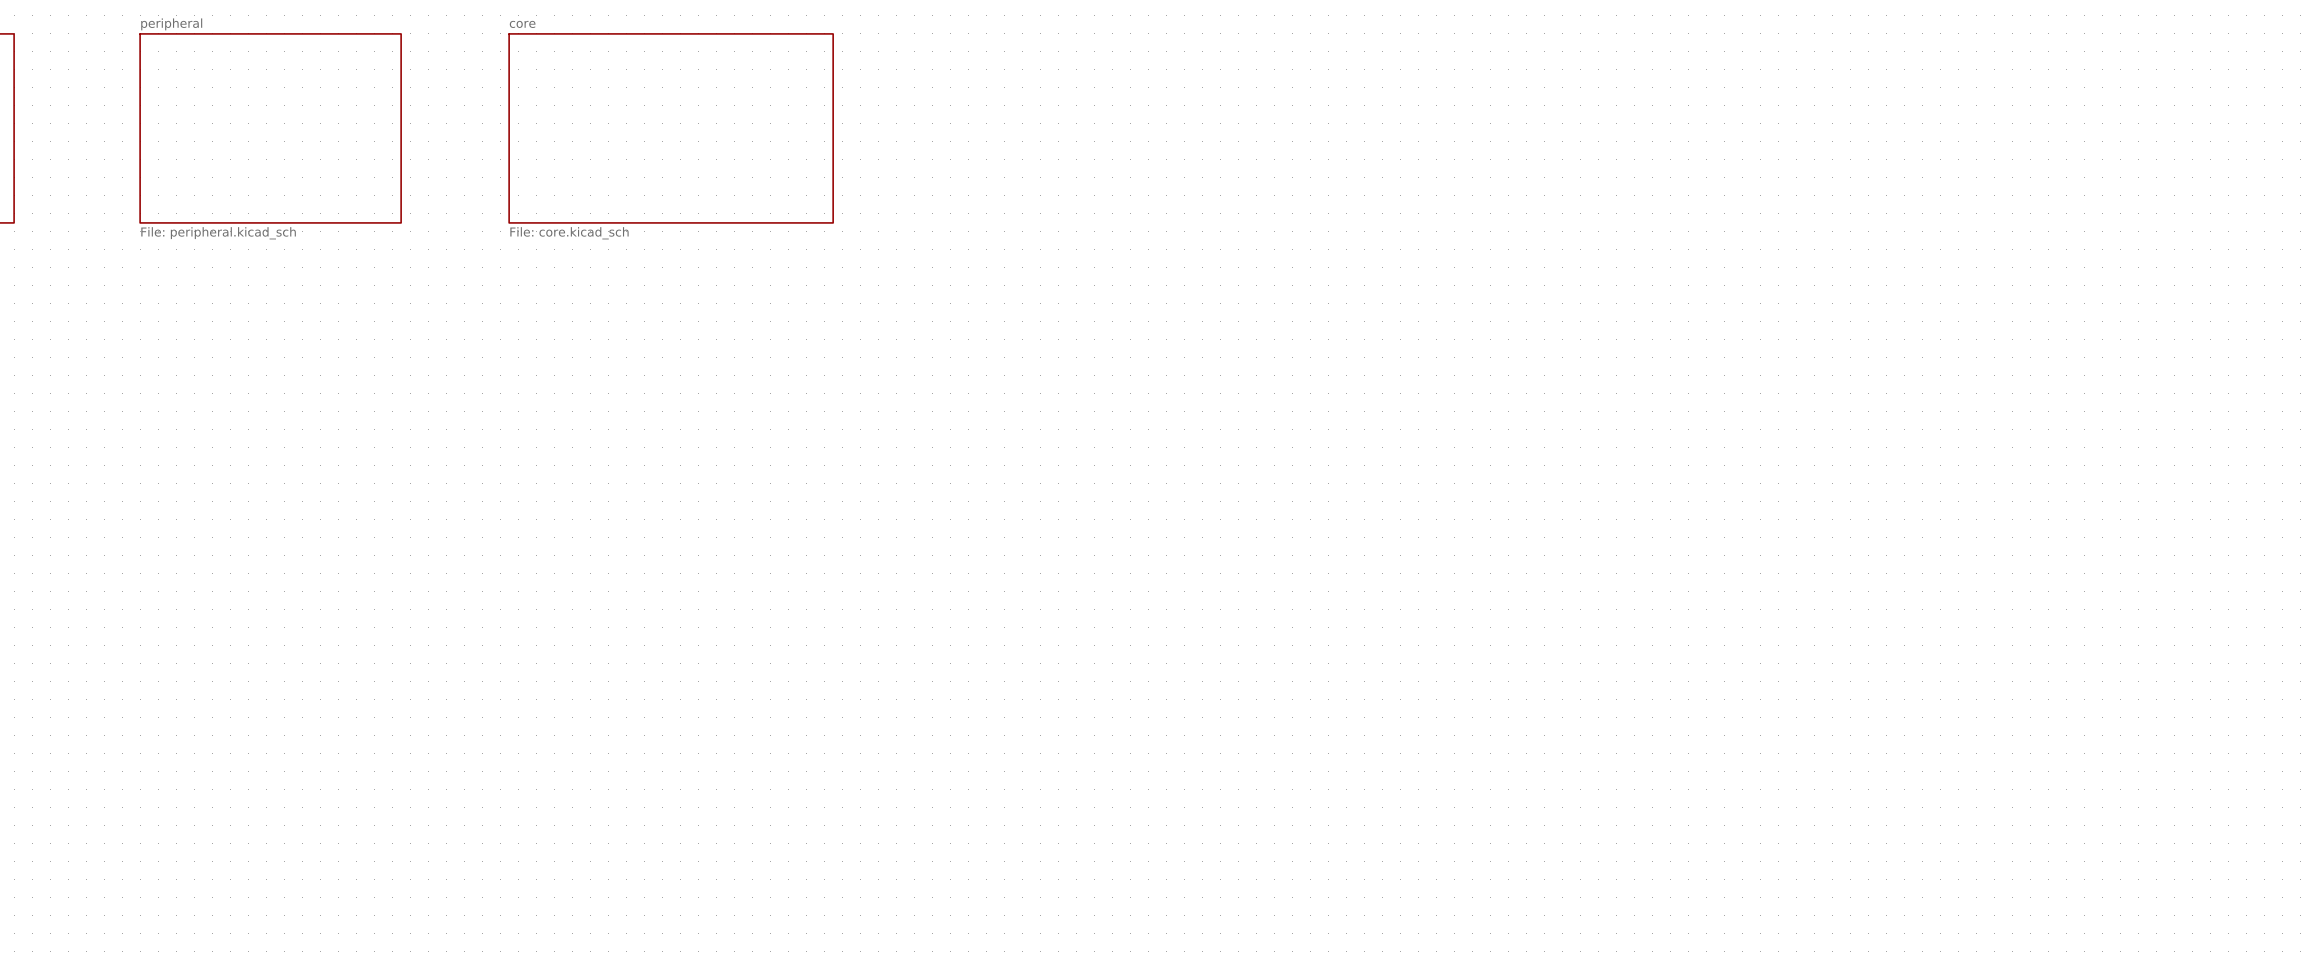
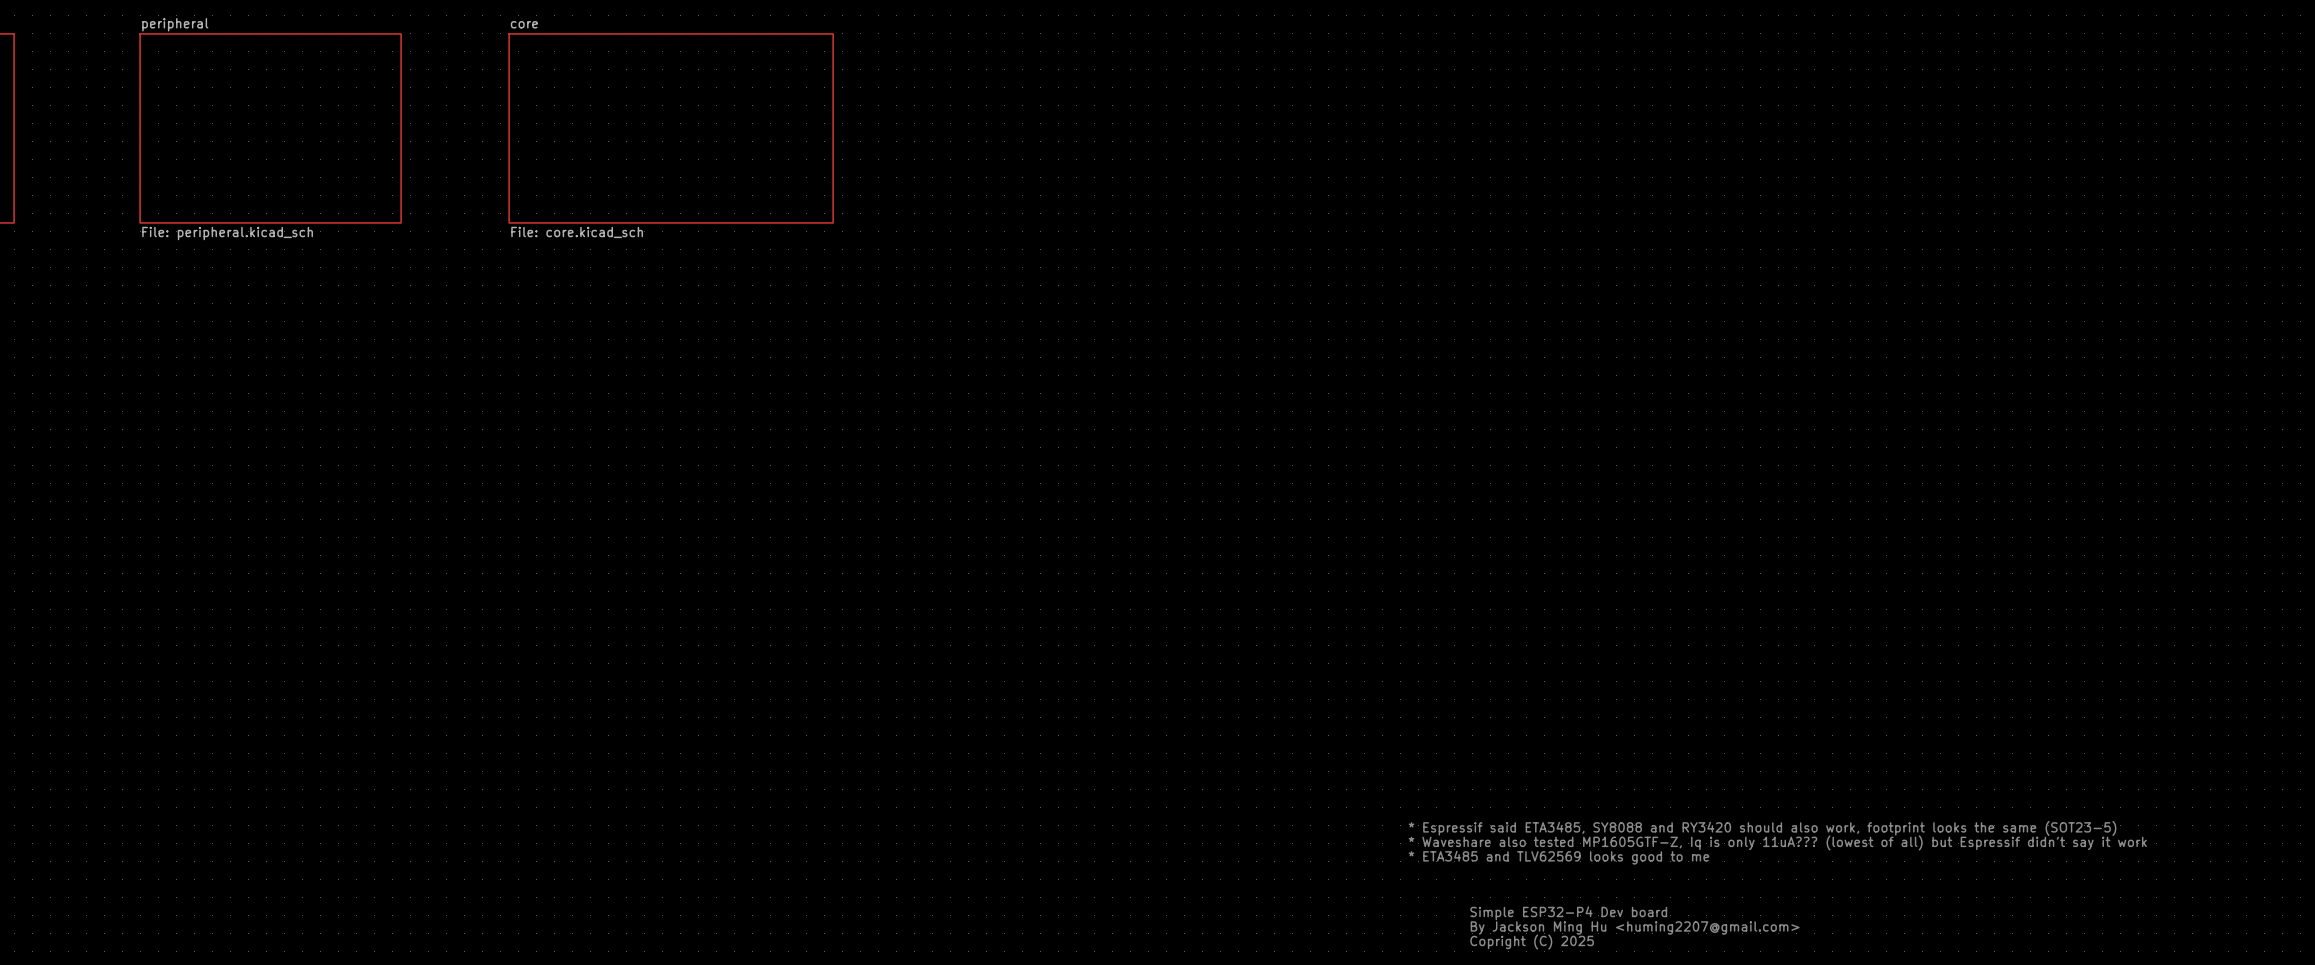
text: none -> * Espressif said ETA3485, SY8088 and RY3420 should also work, footprint looks the same (SOT23-5) (1762, 828)
text: none -> * Waveshare also tested MP1605GTF-Z, Iq is only 11uA??? (lowest of all) but Espressif didn't say it work (1777, 842)
text: none -> * ETA3485 and TLV62569 looks good to me (1558, 857)
text: none -> Simple ESP32-P4 Dev board (1568, 913)
text: none -> By Jackson Ming Hu <huming2207@gmail.com> (1635, 927)
text: none -> Copright (C) 2025 (1532, 942)

